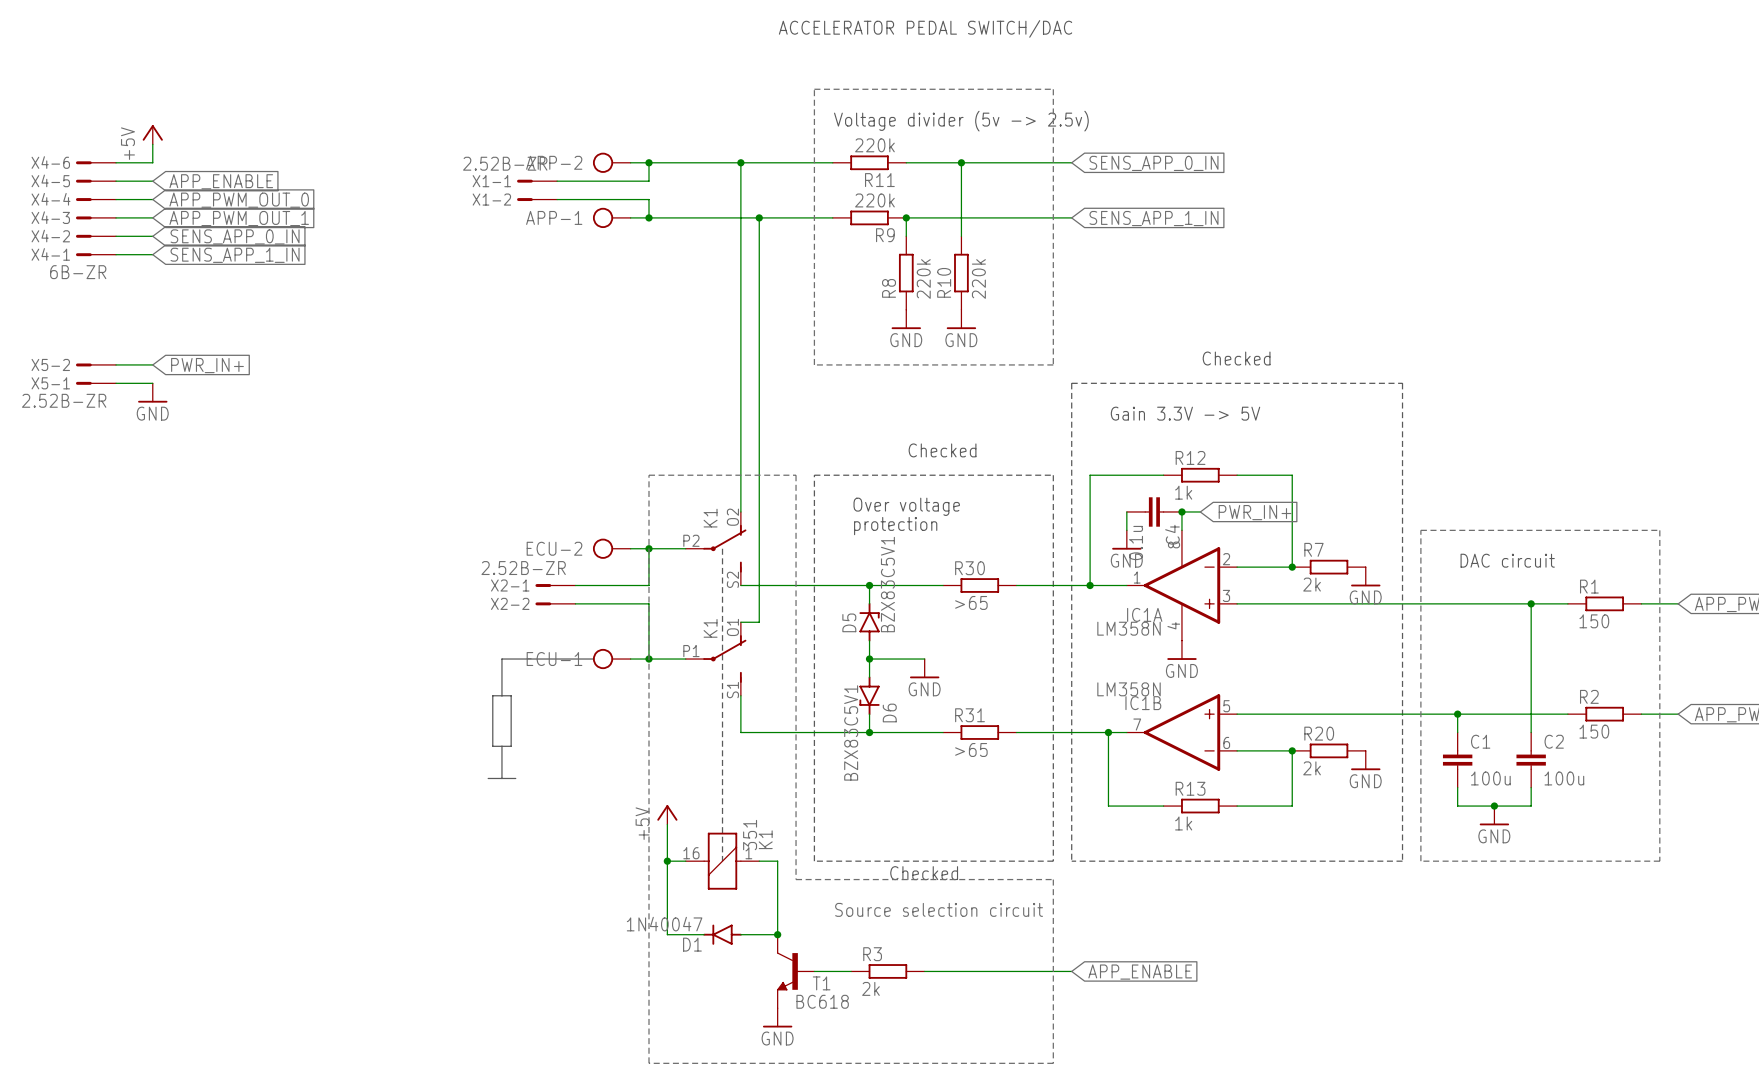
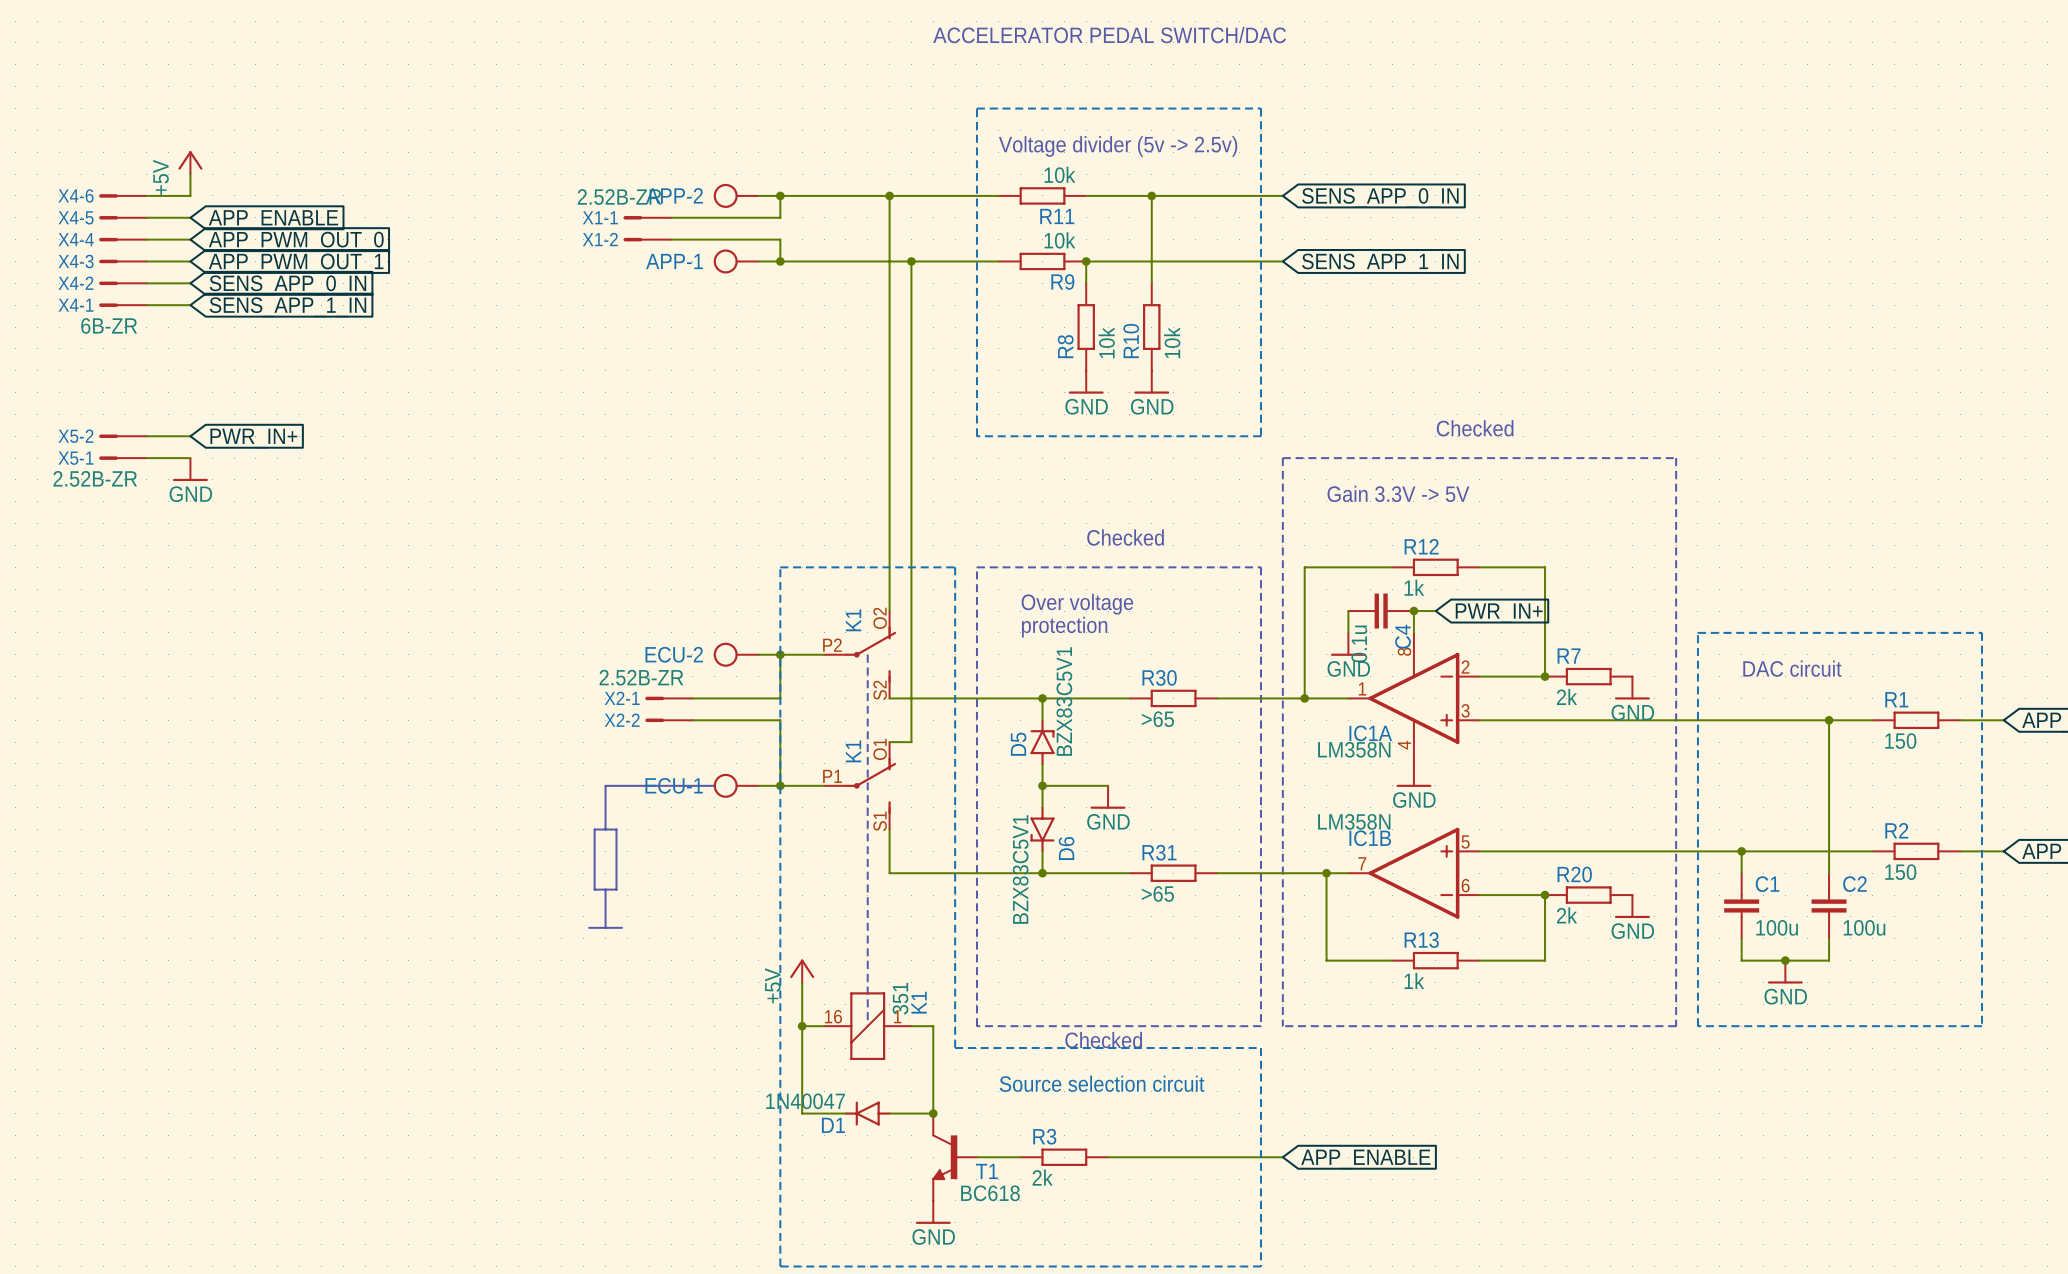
R11 value: 220k (874, 145) -> 10k (1059, 174)
R9 value: 220k (874, 200) -> 10k (1059, 240)
R8 value: 220k (923, 279) -> 10k (1106, 342)
R10 value: 220k (978, 279) -> 10k (1172, 342)

